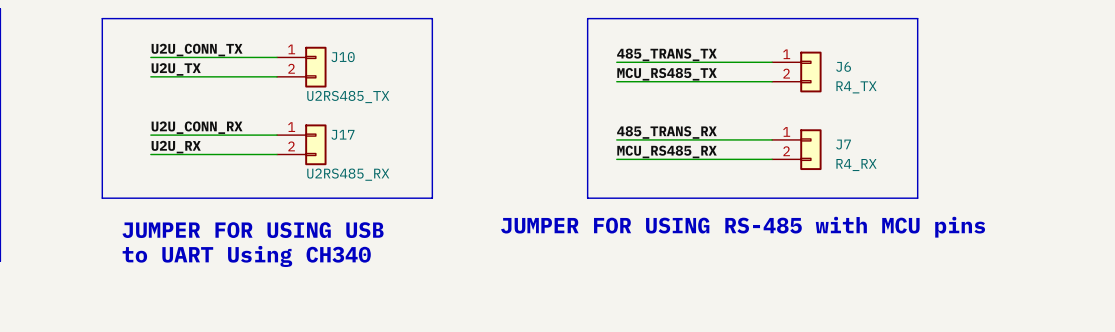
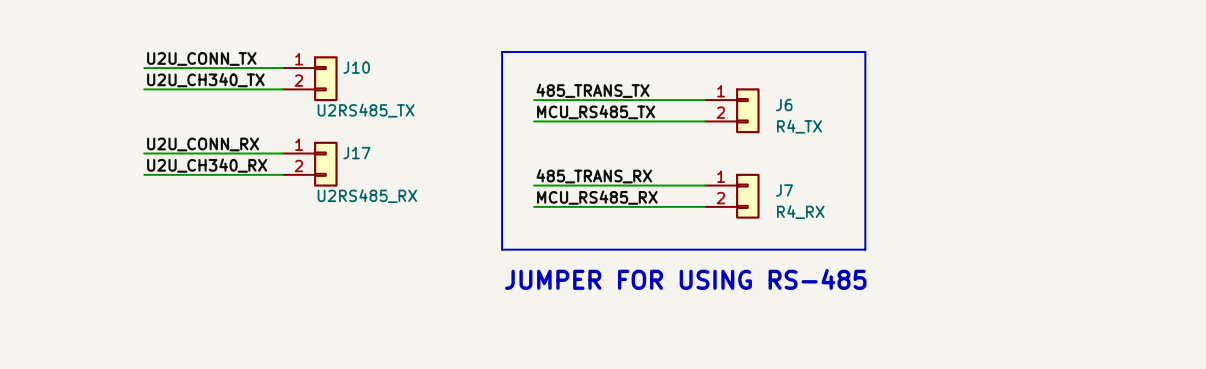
bus: (102, 18) (432, 18) (432, 198) (102, 198) (102, 18) -> none
bus: (587, 18) (917, 18) (917, 198) (587, 198) (587, 18) -> (502, 52) (865, 52) (865, 249) (502, 249) (502, 52)
label position: 485_TRANS_TX (666, 54) -> 485_TRANS_TX (593, 90)
wire: (616, 62) (772, 62) -> (534, 100) (705, 100)
label: U2U_TX (176, 69) -> U2U_CH340_TX (205, 80)
J6 position: (796, 72) -> (732, 110)
label position: MCU_RS485_TX (667, 74) -> MCU_RS485_TX (596, 112)
wire: (616, 81) (772, 81) -> (534, 121) (705, 121)
label position: 485_TRANS_RX (666, 132) -> 485_TRANS_RX (594, 176)
wire: (616, 139) (772, 139) -> (534, 185) (705, 185)
label: U2U_RX (176, 147) -> U2U_CH340_RX (207, 165)
J7 position: (796, 149) -> (732, 196)
label position: MCU_RS485_RX (667, 151) -> MCU_RS485_RX (597, 197)
wire: (616, 159) (772, 159) -> (534, 206) (705, 206)
text: JUMPER FOR USING RS-485 with MCU pins (743, 227) -> JUMPER FOR USING RS-485 (685, 279)
text: JUMPER FOR USING USB (253, 230) -> none
text: to UART Using CH340 (246, 256) -> none

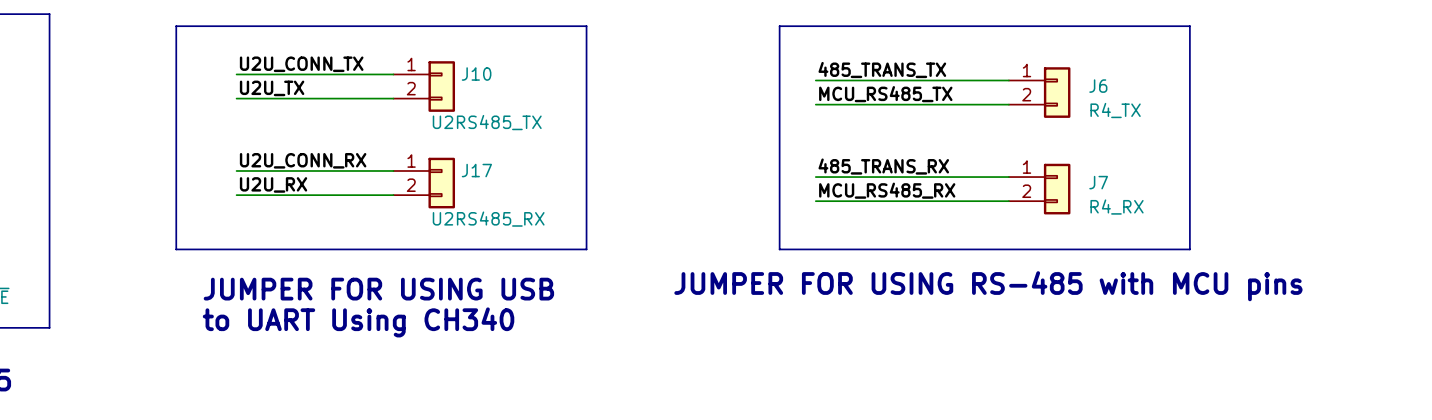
bus: none -> (176, 26) (586, 26) (586, 249) (176, 249) (176, 26)
bus: (502, 52) (865, 52) (865, 249) (502, 249) (502, 52) -> (779, 26) (1189, 26) (1189, 249) (779, 249) (779, 26)
label: U2U_CH340_TX (205, 80) -> U2U_TX (272, 88)
label position: 485_TRANS_TX (593, 90) -> 485_TRANS_TX (882, 70)
wire: (534, 100) (705, 100) -> (815, 80) (1008, 80)
J6 position: (732, 110) -> (1039, 92)
label position: MCU_RS485_TX (596, 112) -> MCU_RS485_TX (885, 94)
wire: (534, 121) (705, 121) -> (815, 104) (1008, 104)
label: U2U_CH340_RX (207, 165) -> U2U_RX (273, 184)
label position: 485_TRANS_RX (594, 176) -> 485_TRANS_RX (883, 166)
wire: (534, 185) (705, 185) -> (815, 177) (1008, 177)
J7 position: (732, 196) -> (1039, 189)
label position: MCU_RS485_RX (597, 197) -> MCU_RS485_RX (887, 190)
wire: (534, 206) (705, 206) -> (815, 201) (1008, 201)
text: none -> JUMPER FOR USING USB (378, 289)
text: JUMPER FOR USING RS-485 (685, 279) -> JUMPER FOR USING RS-485 with MCU pins (988, 286)
text: none -> to UART Using CH340 (358, 322)

